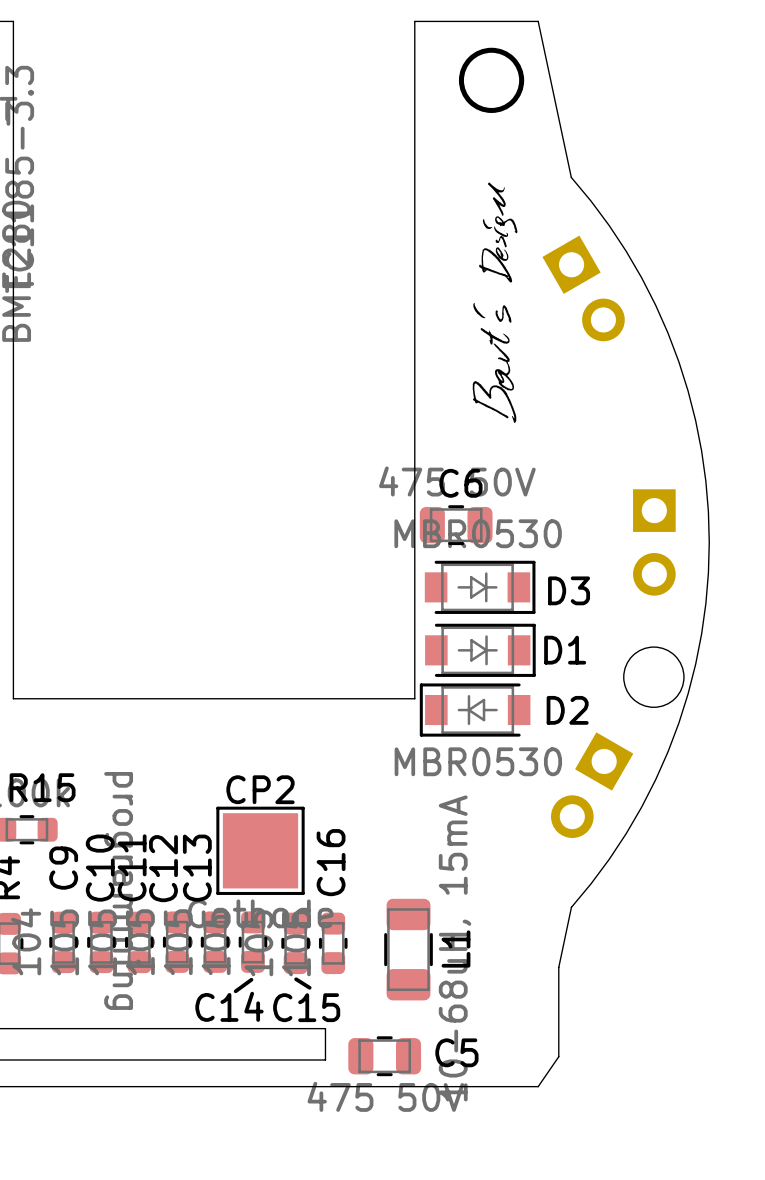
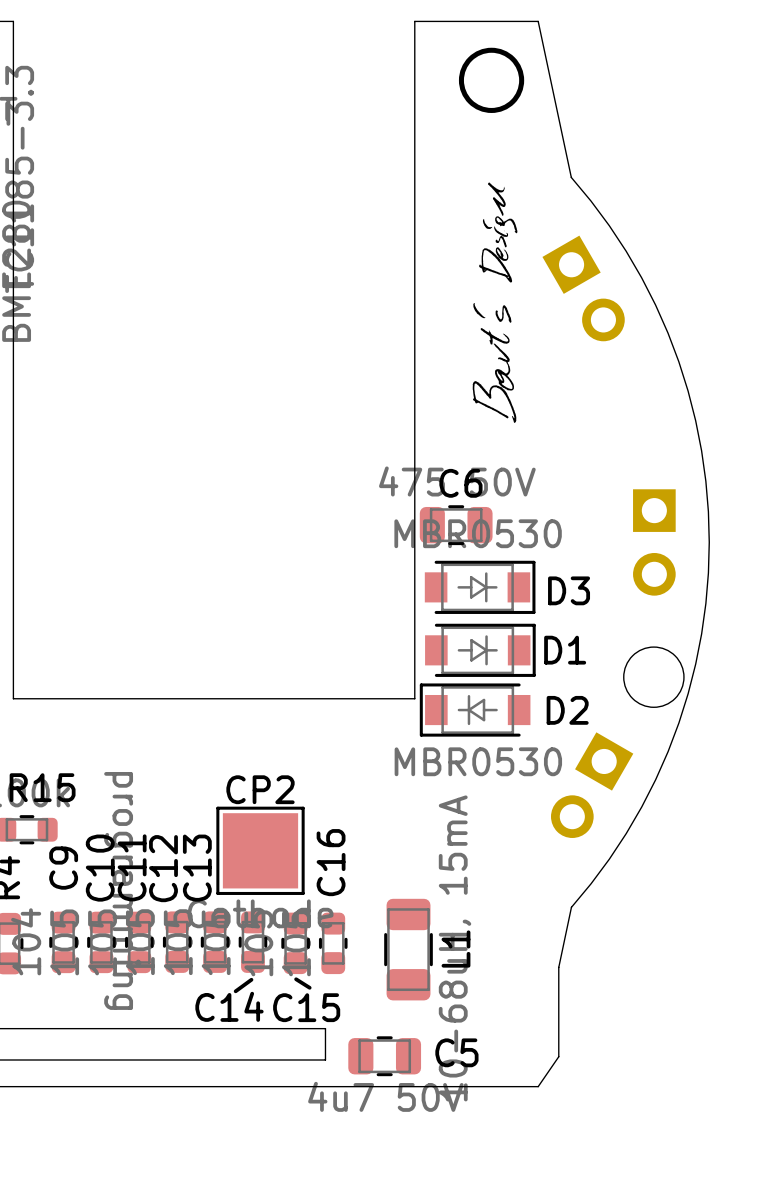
C5 value: 475 50V (385, 1096) -> 4u7 50V (385, 1096)

